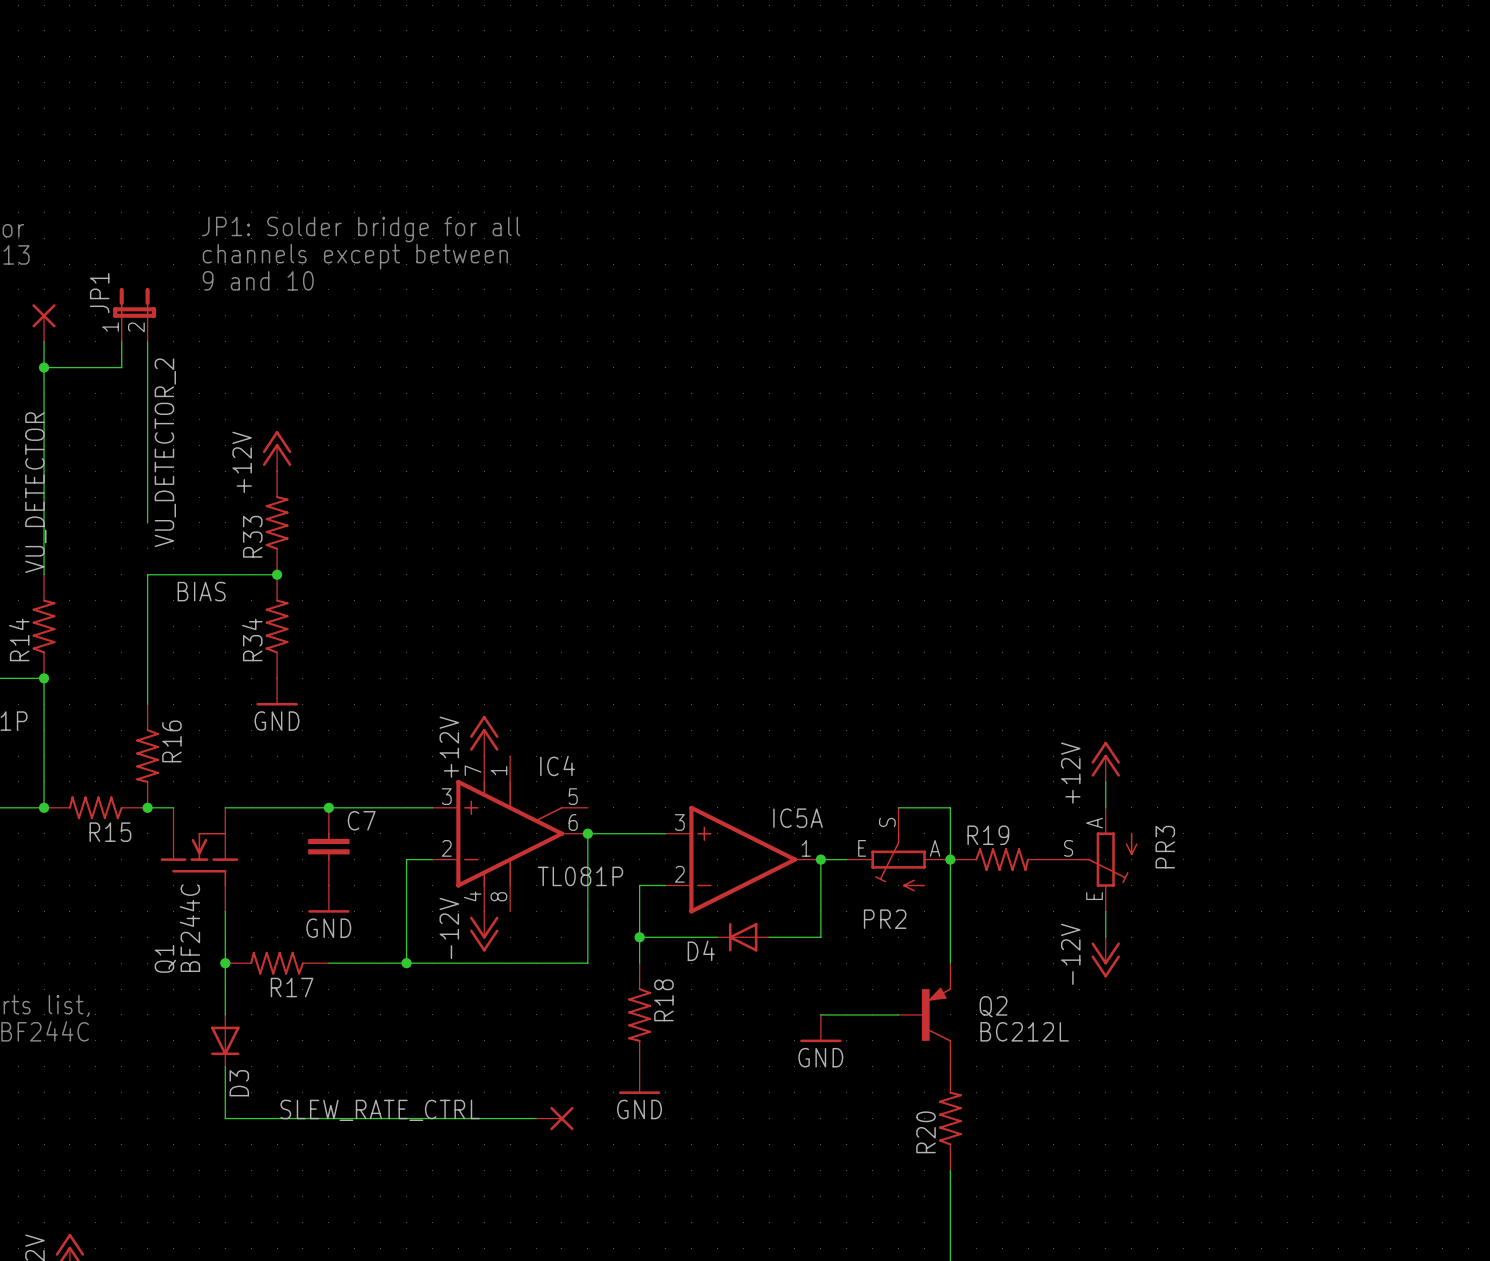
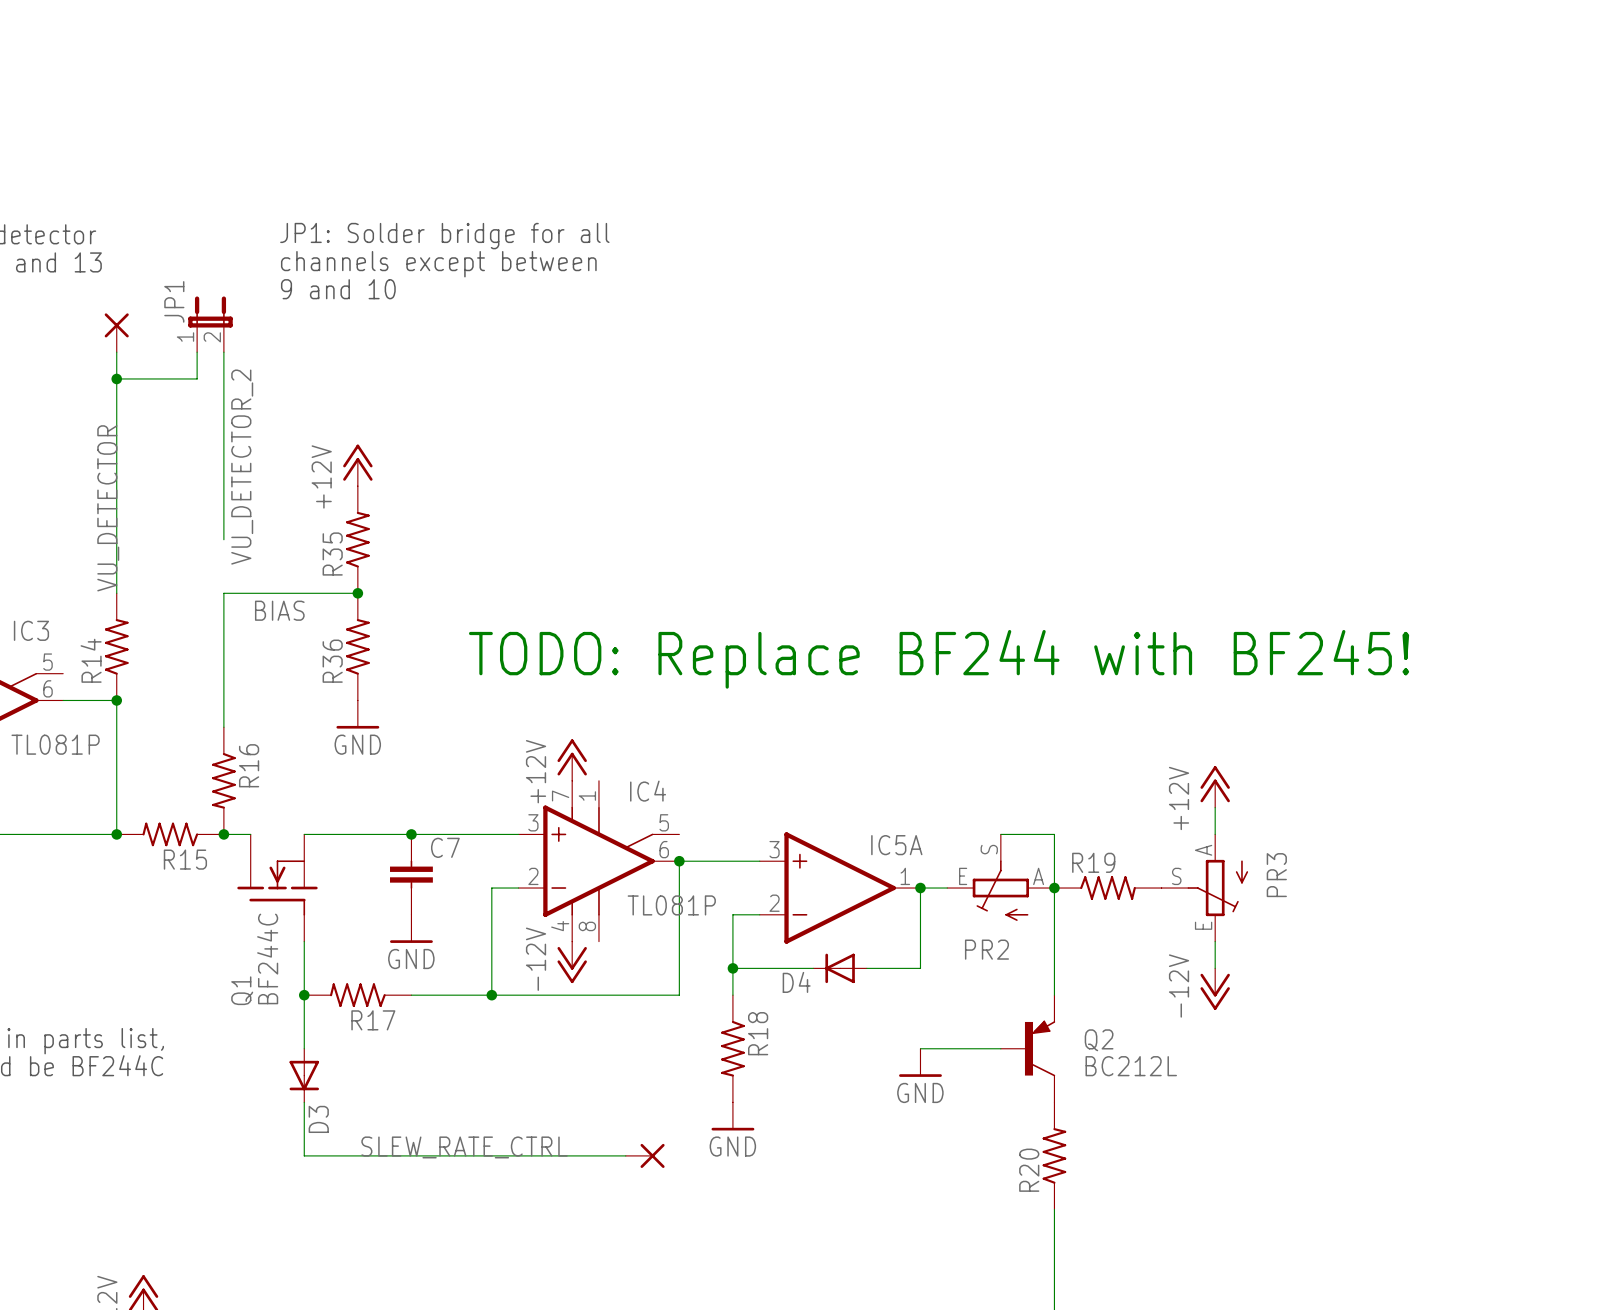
R33 name: R33 (252, 536) -> R35 (332, 554)
text: none -> TODO: Replace BF244 with BF245! (939, 659)
R34 name: R34 (252, 639) -> R36 (332, 661)

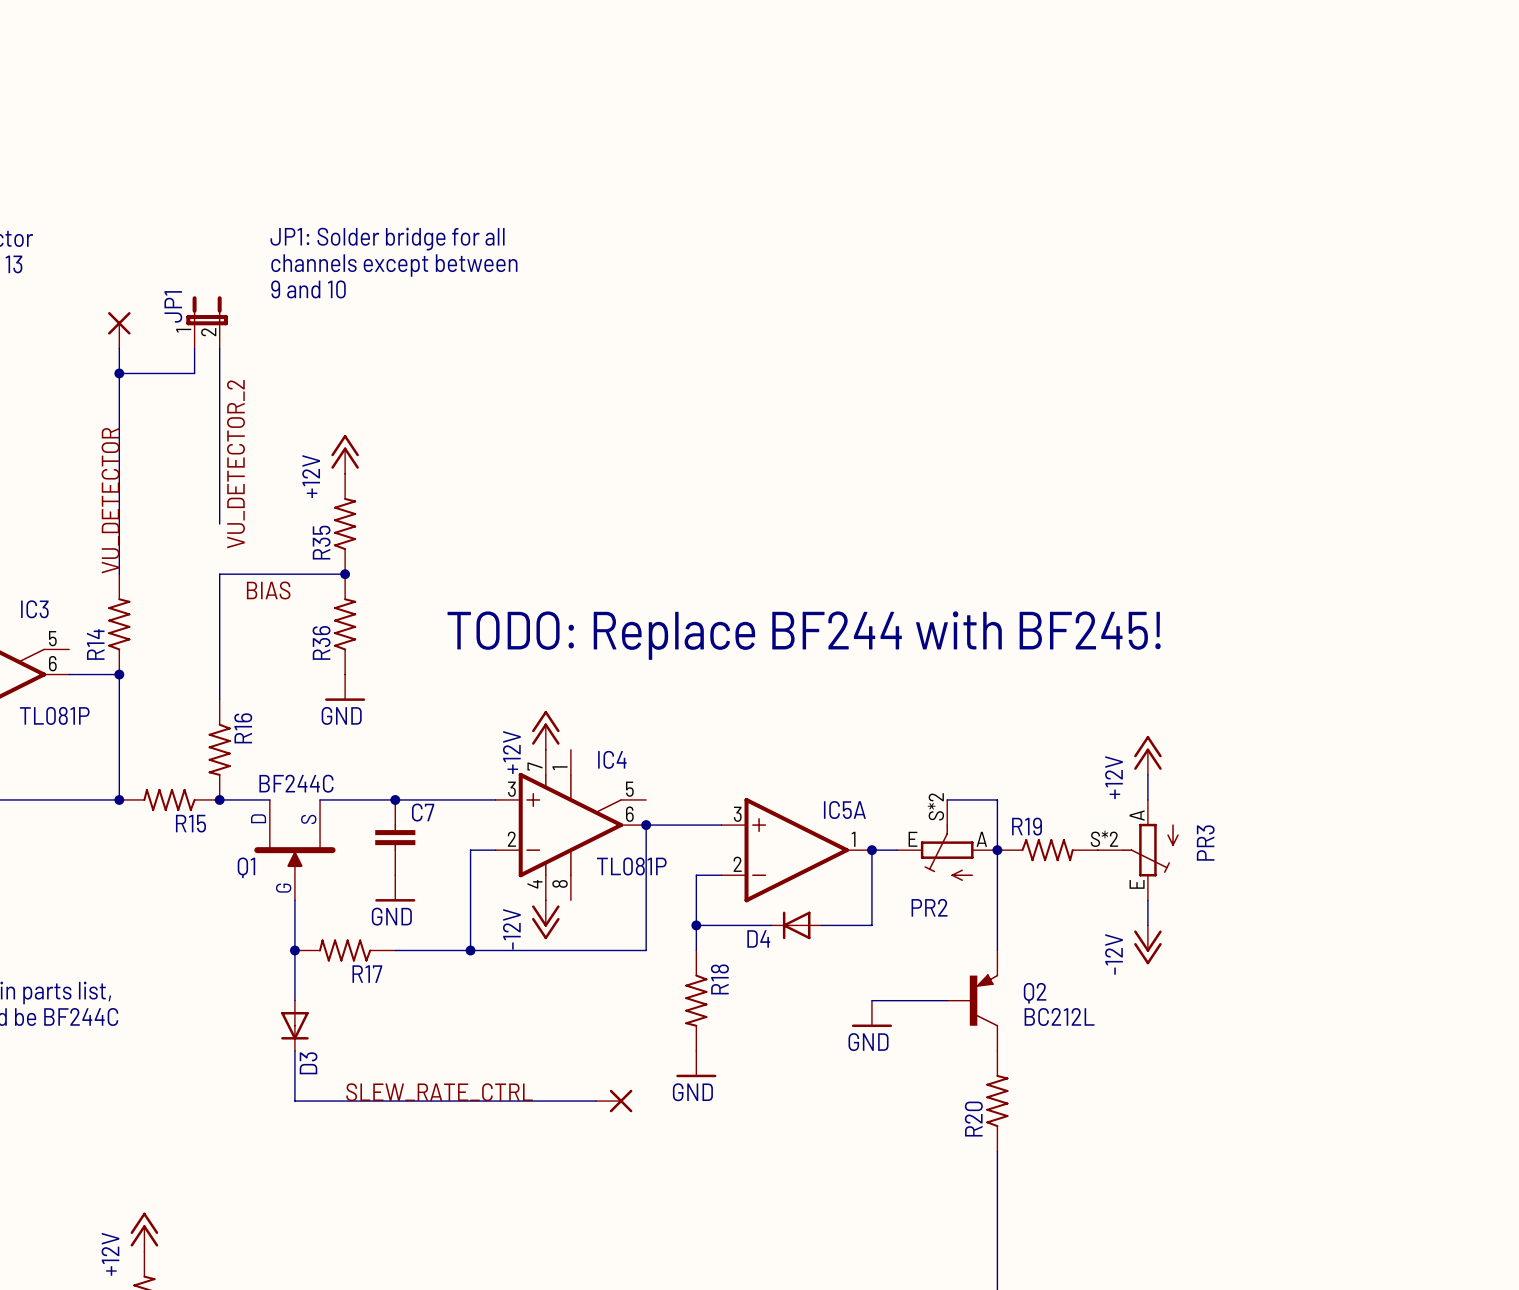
Q1 symbol: [237, 834, 318, 942] -> [254, 799, 336, 901]
wire: (304, 834) (331, 834) -> (244, 799) (269, 799)
PR2 pin number: S (989, 849) -> S*2 (935, 806)
PR3 pin number: S (1176, 876) -> S*2 (1104, 838)
Q1 value position: BF244C (267, 958) -> BF244C (296, 783)
Q1 name position: Q1 (242, 990) -> Q1 (246, 867)

